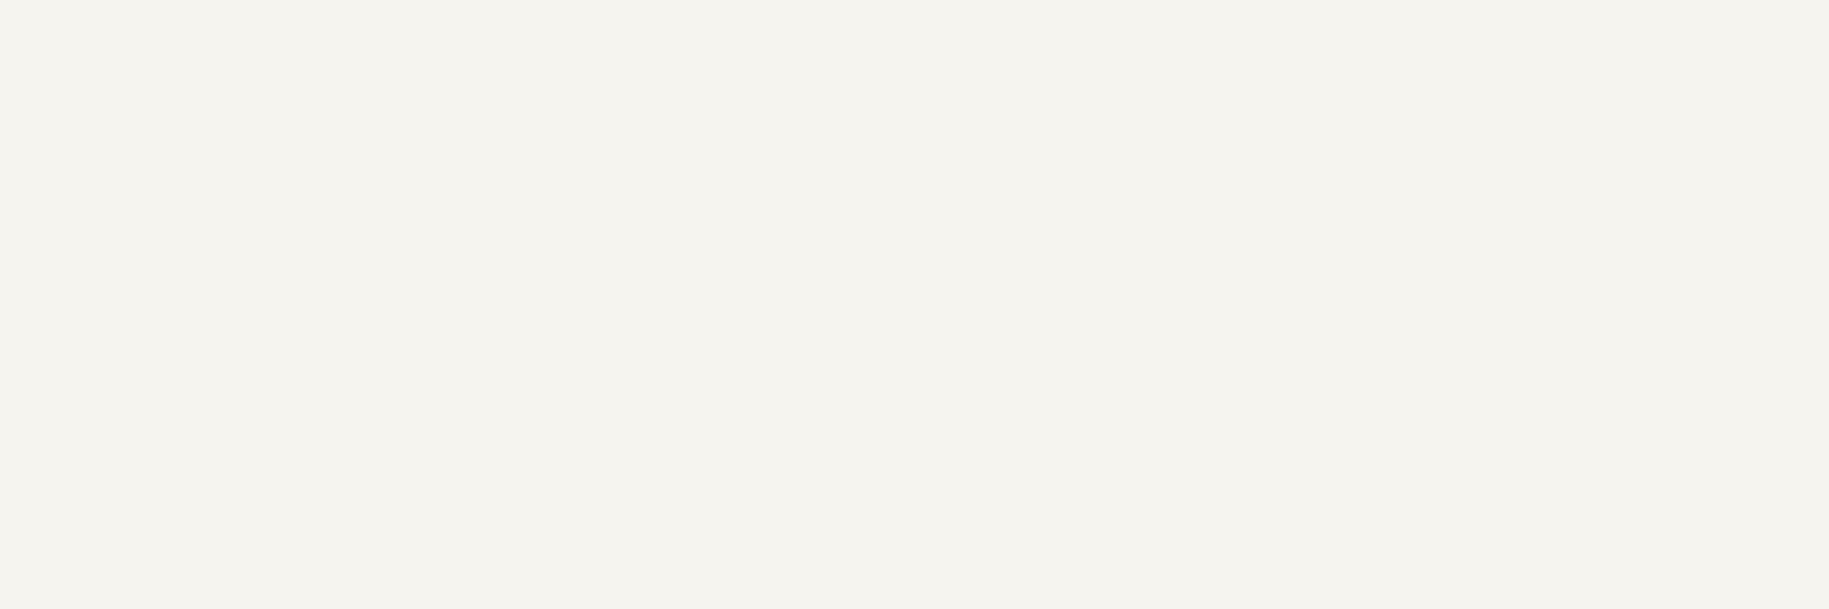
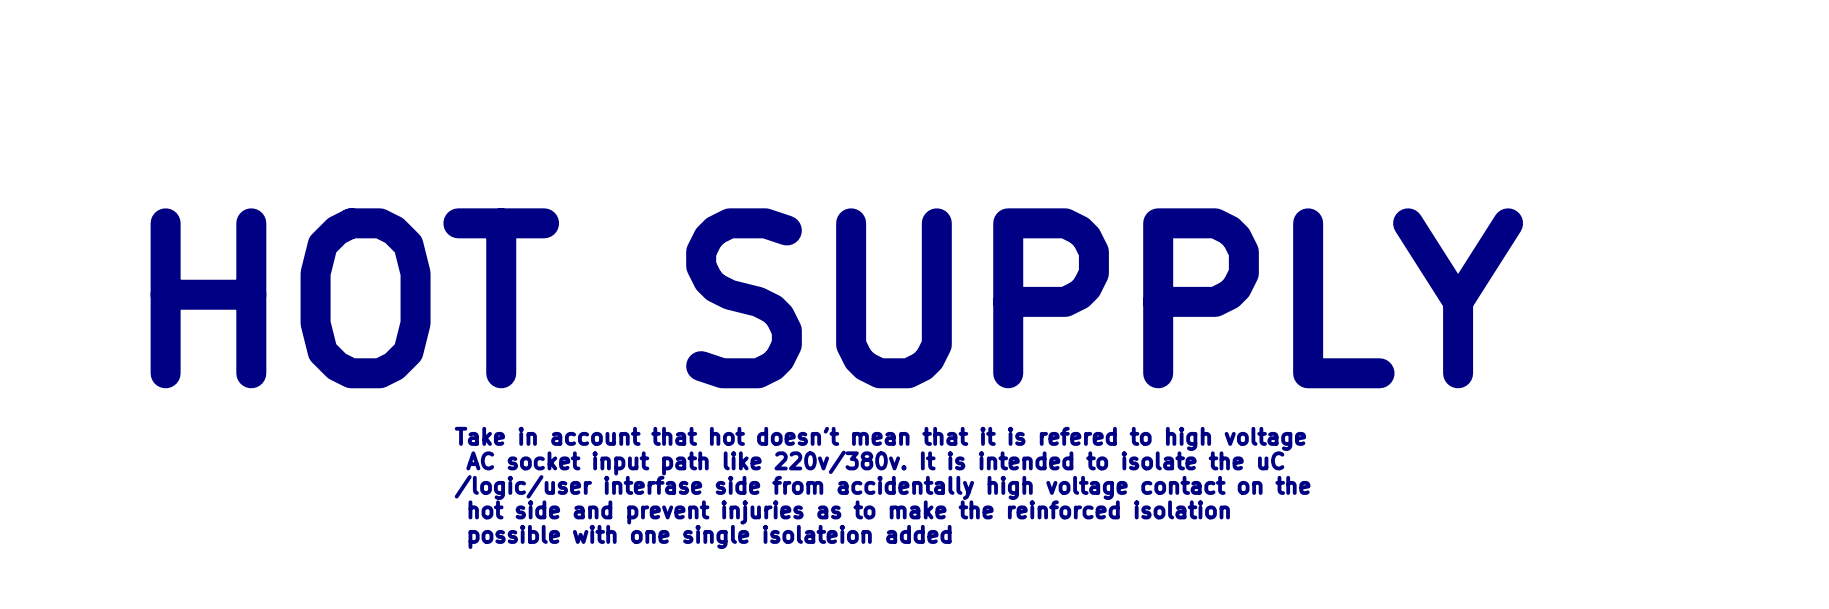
text: none -> HOT SUPPLY (836, 298)
text: none -> Take in account that hot doesn't mean that it is refered to high voltage (880, 438)
text: none -> AC socket input path like 220v/380v. It is intended to isolate the uC (875, 463)
text: none -> /logic/user interfase side from accidentally high voltage contact on the (882, 487)
text: none -> hot side and prevent injuries as to make the reinforced isolation (849, 512)
text: none -> possible with one single isolateion added (710, 536)

